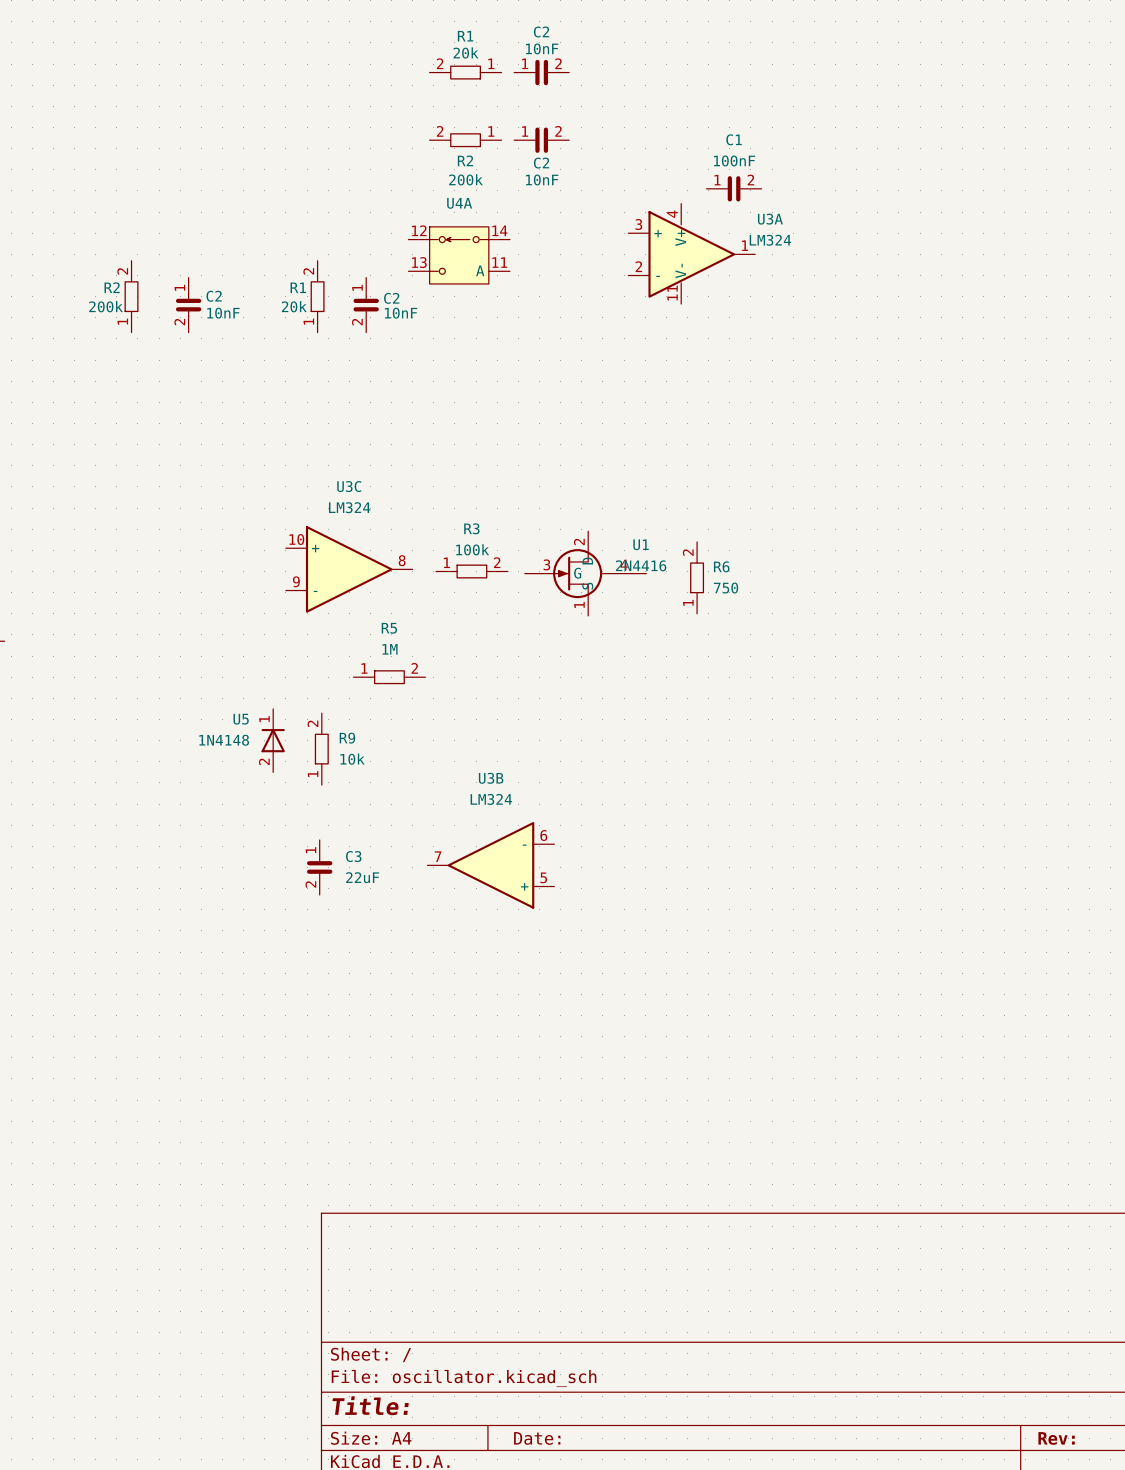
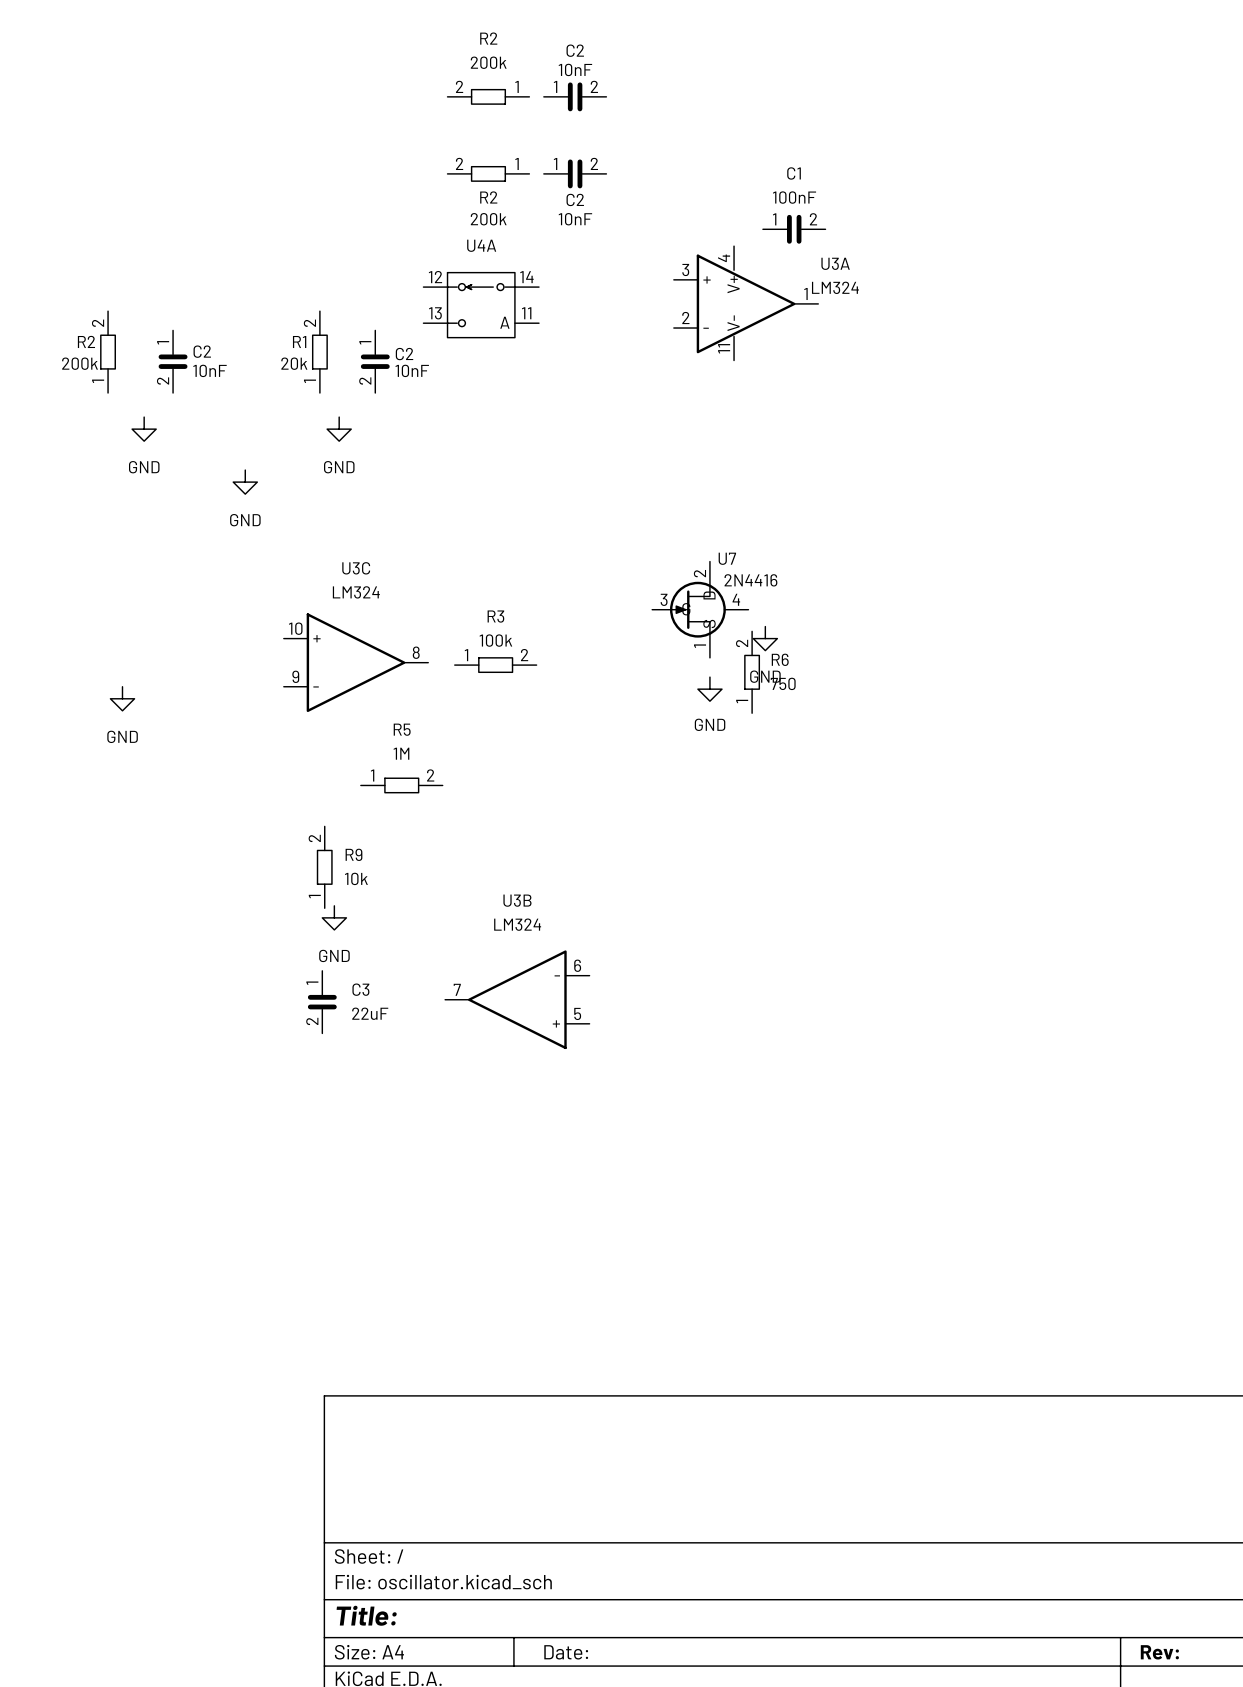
R1 name: R1 (465, 36) -> R2 (488, 38)
R1 text: 20k (465, 53) -> 200k (488, 62)
power symbol: none -> GND (144, 429)
power symbol: none -> GND (339, 429)
power symbol: none -> GND (245, 482)
U7: none -> 2N4416 (700, 609)
power symbol: none -> GND (765, 638)
U1: 2N4416 (585, 573) -> none
power symbol: none -> GND (709, 689)
power symbol: none -> GND (122, 698)
U5: 1N4148 (273, 740) -> none
power symbol: none -> GND (334, 917)

